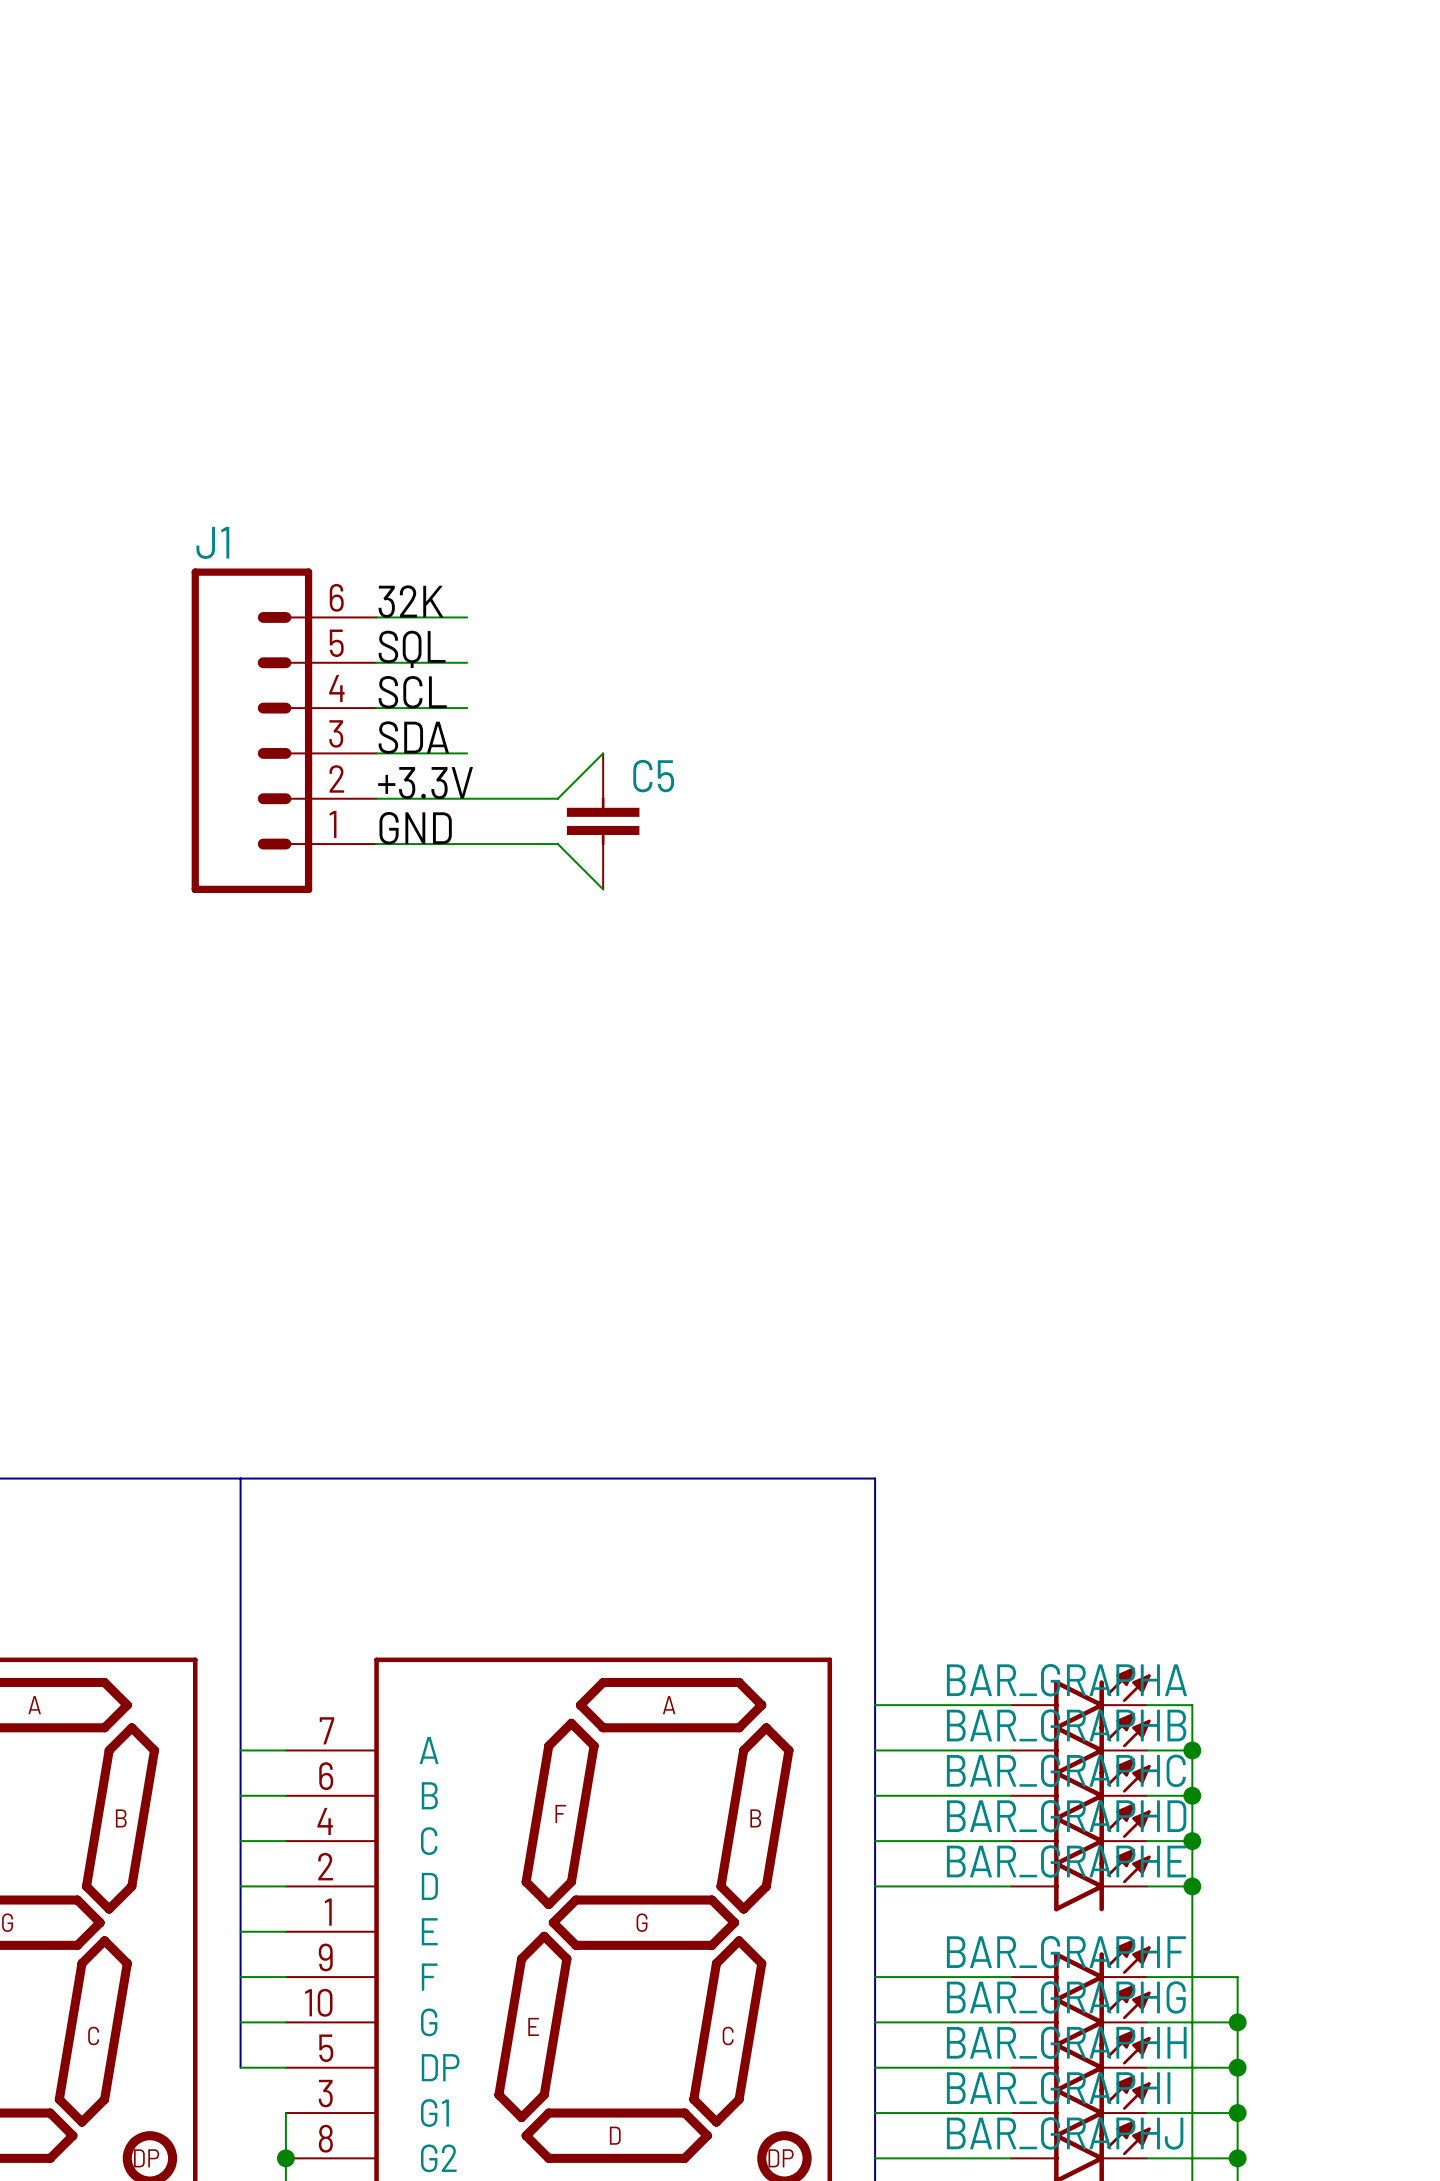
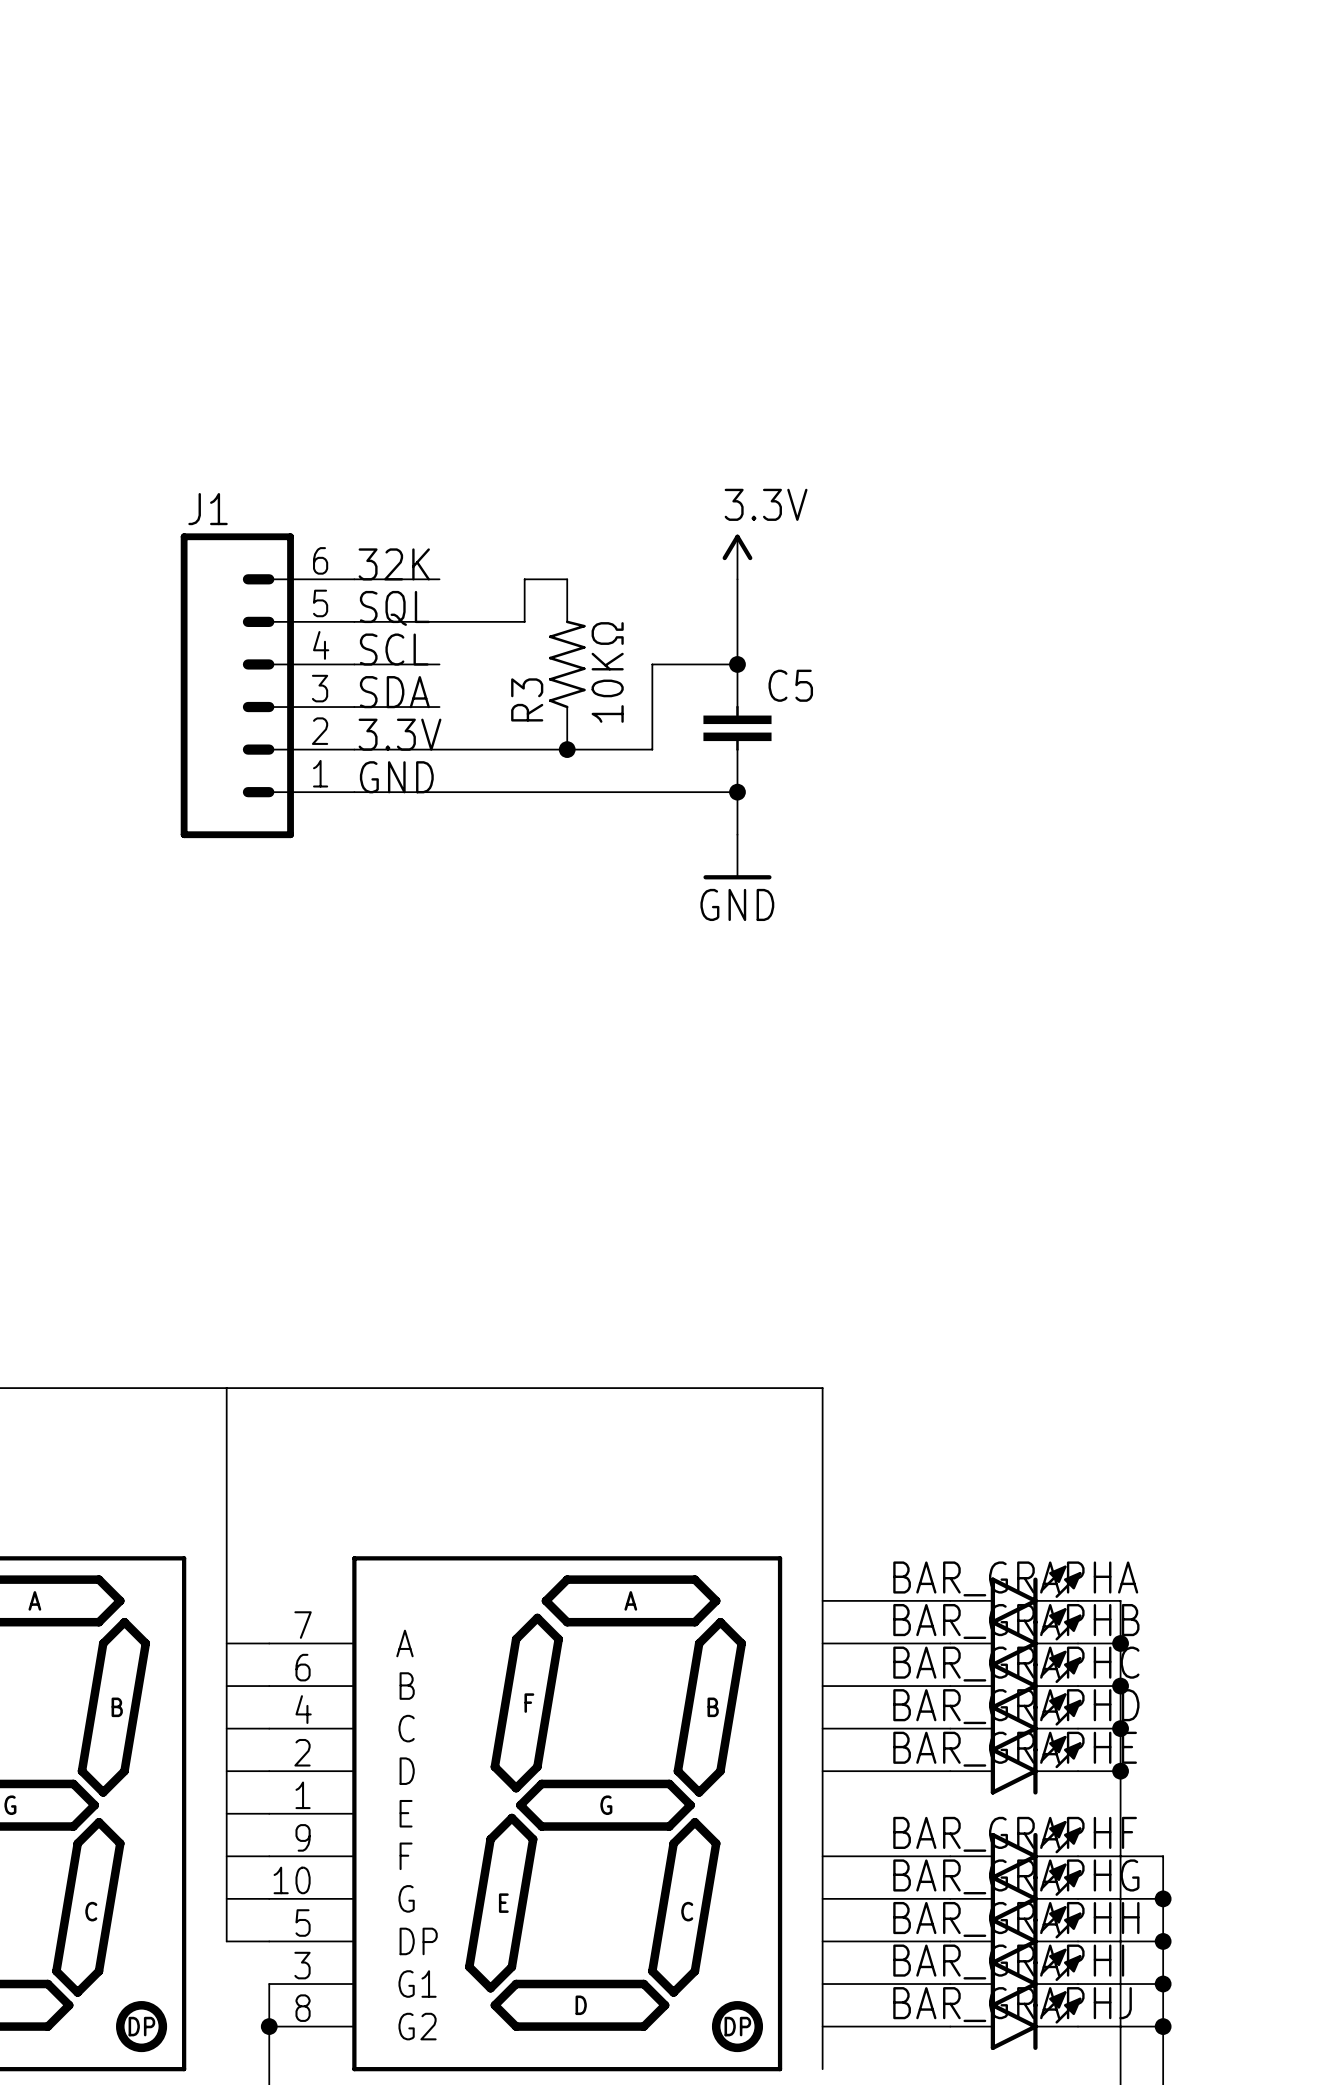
power symbol: none -> 3.3V (737, 556)
wire: none -> (567, 579) (524, 579) (524, 621) (439, 621)
R3: none -> 10KΩ (567, 664)
junction: none -> (737, 664)
wire: (603, 753) (557, 798) -> (737, 579) (737, 664) (652, 664) (652, 749) (524, 749)
label: +3.3V (425, 783) -> 3.3V (400, 734)
junction: none -> (567, 749)
C5 position: (603, 821) -> (737, 728)
wire: (557, 844) (603, 889) -> (524, 792) (737, 792) (737, 834)
junction: none -> (737, 792)
power symbol: none -> GND (737, 857)

